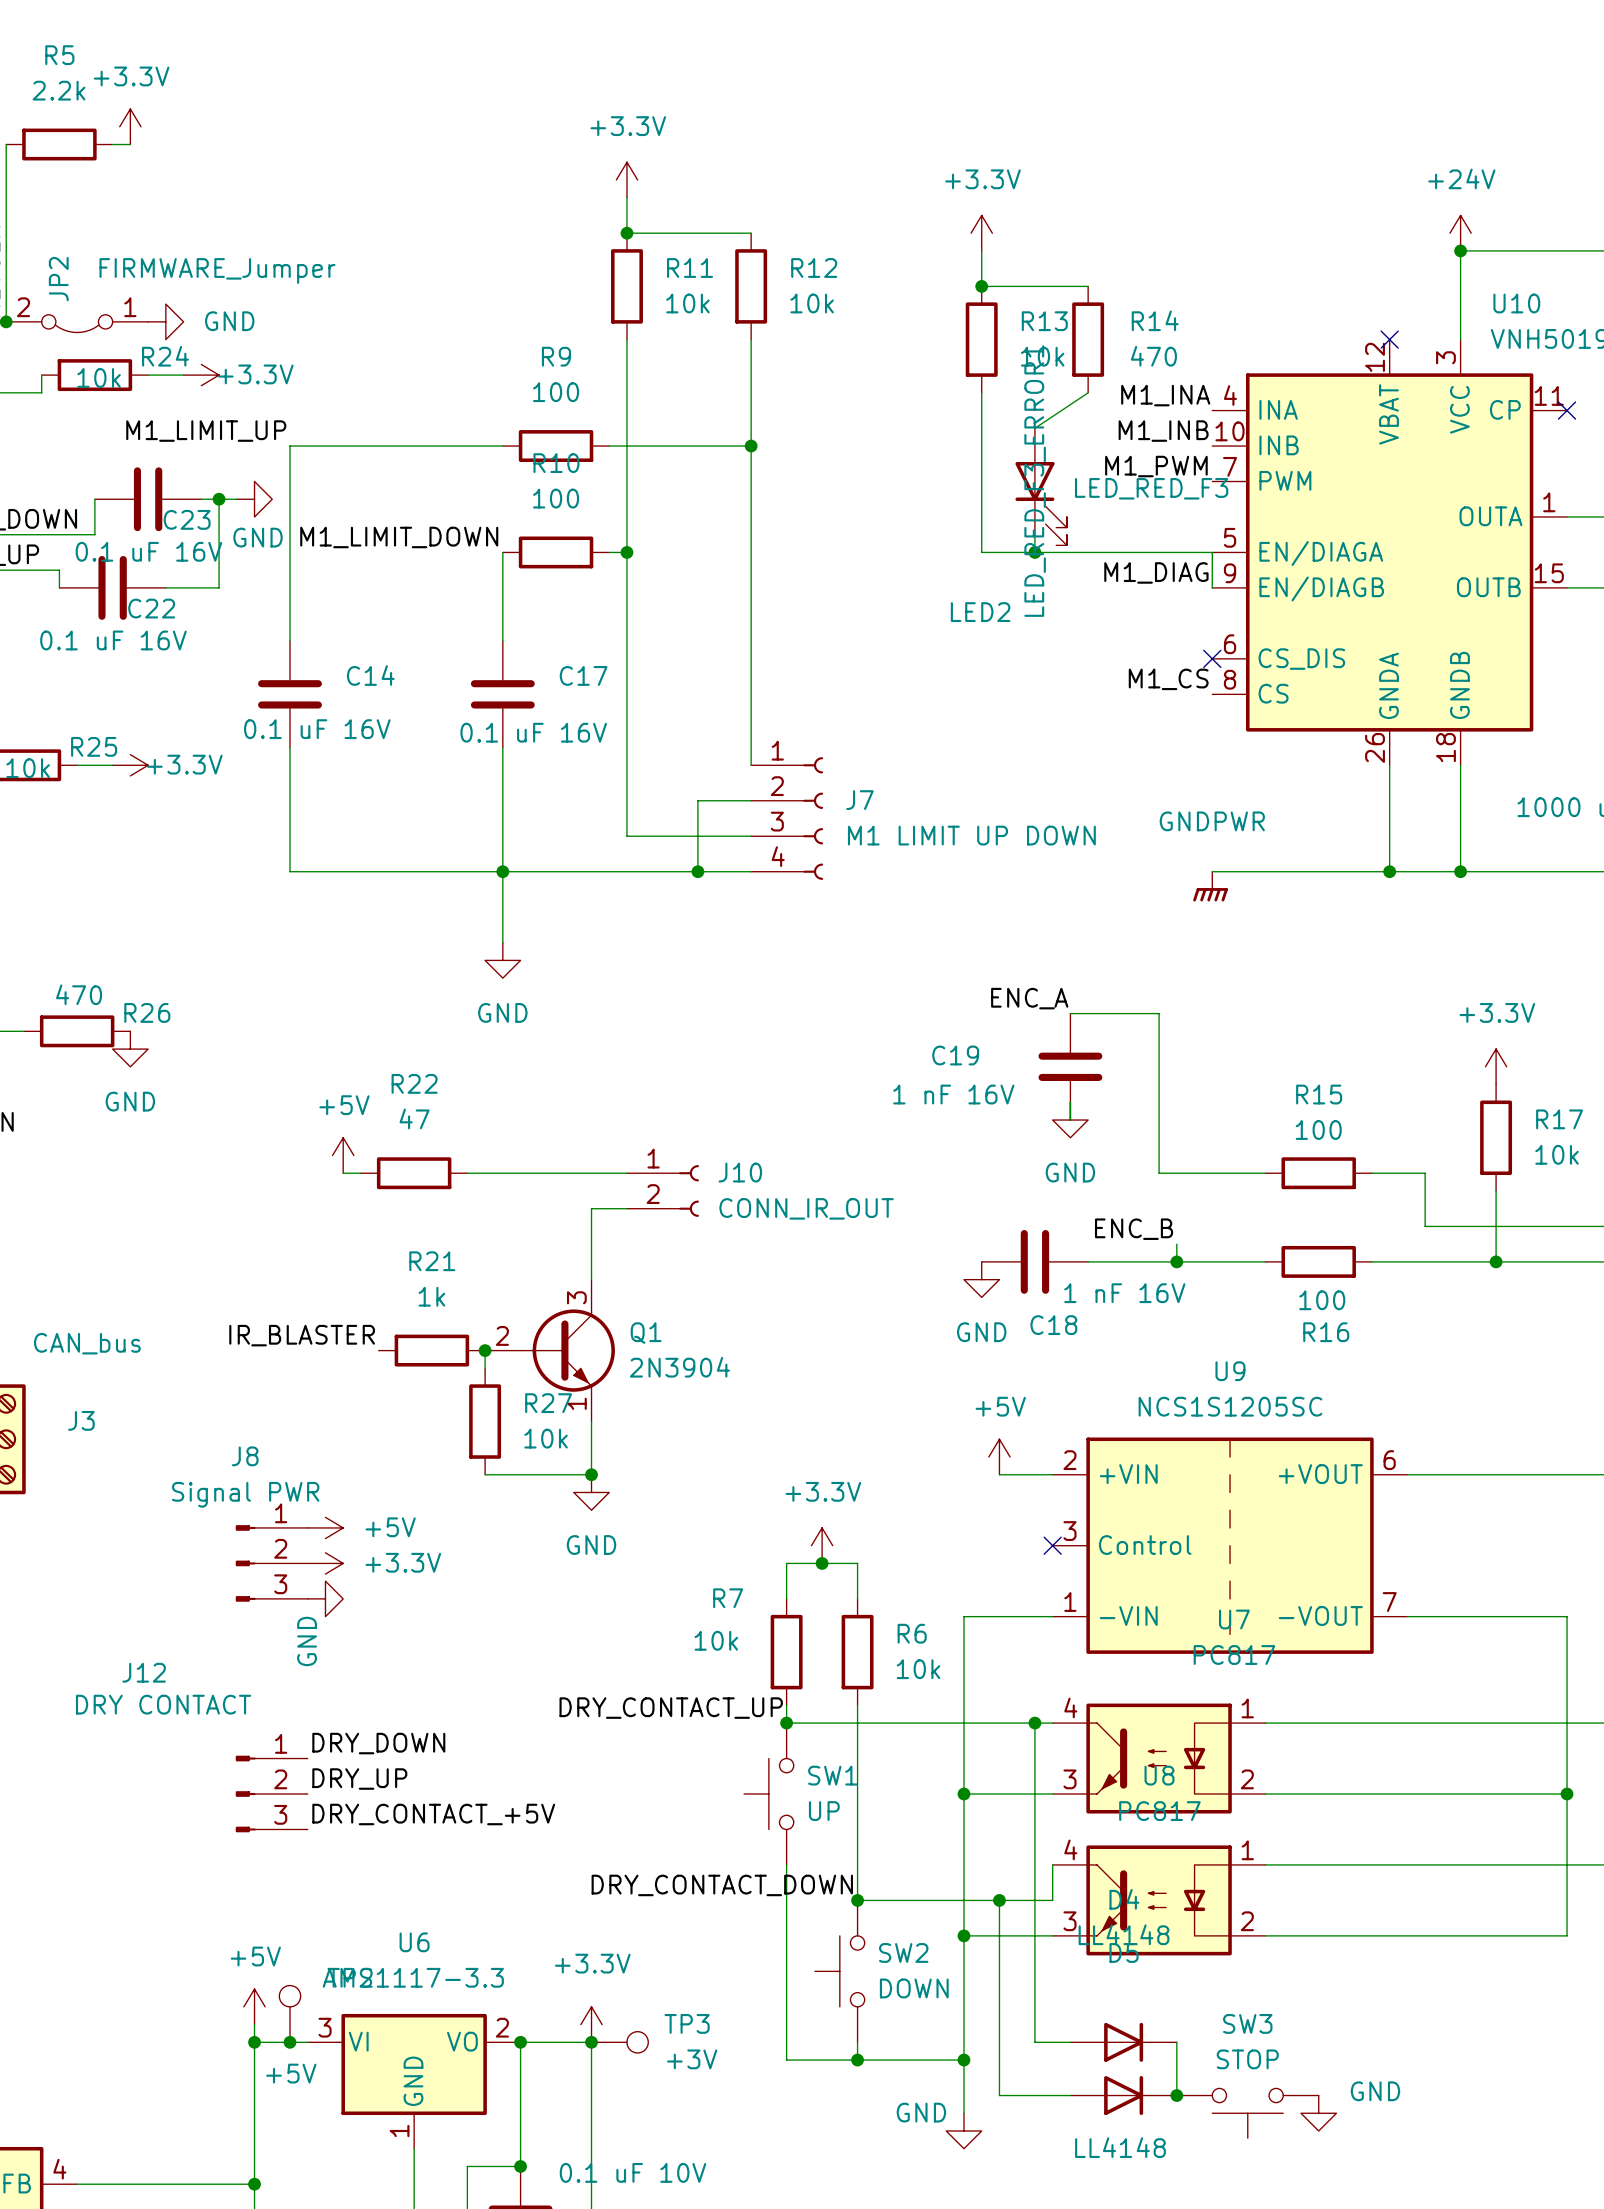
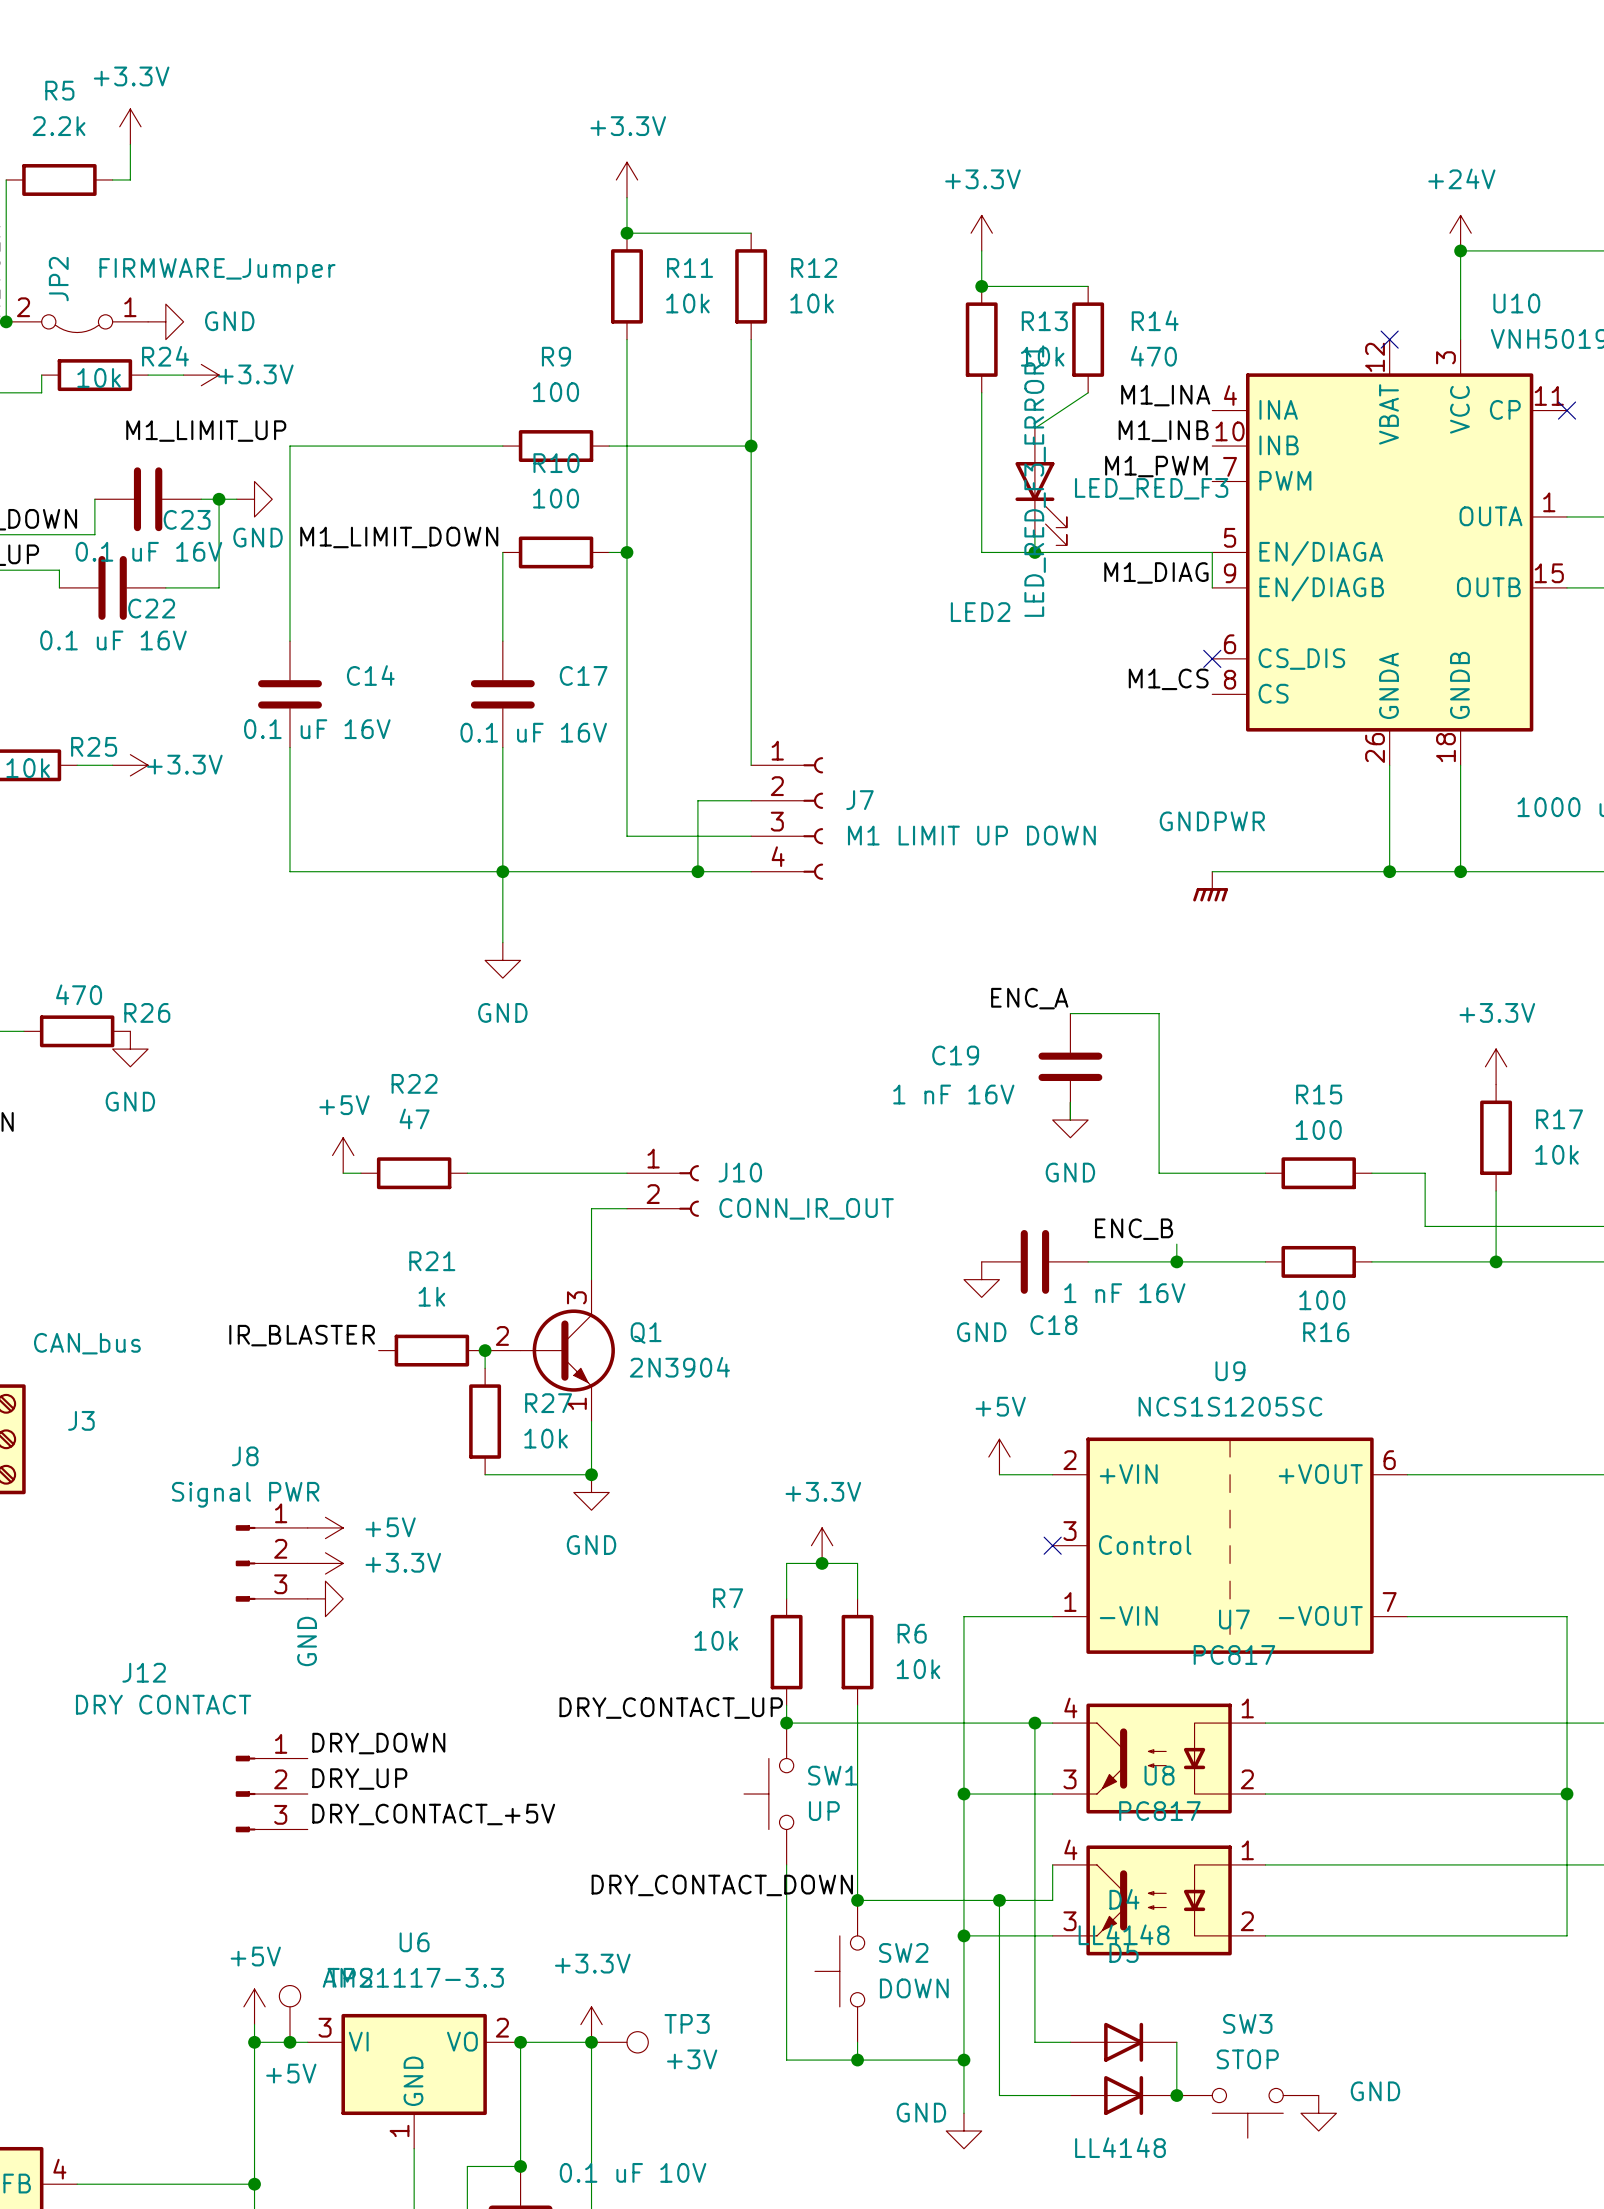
wire: (6, 144) (6, 179) -> none
R5 position: (59, 144) -> (59, 179)
wire: (112, 144) (130, 144) -> (112, 179) (130, 179) (130, 144)

